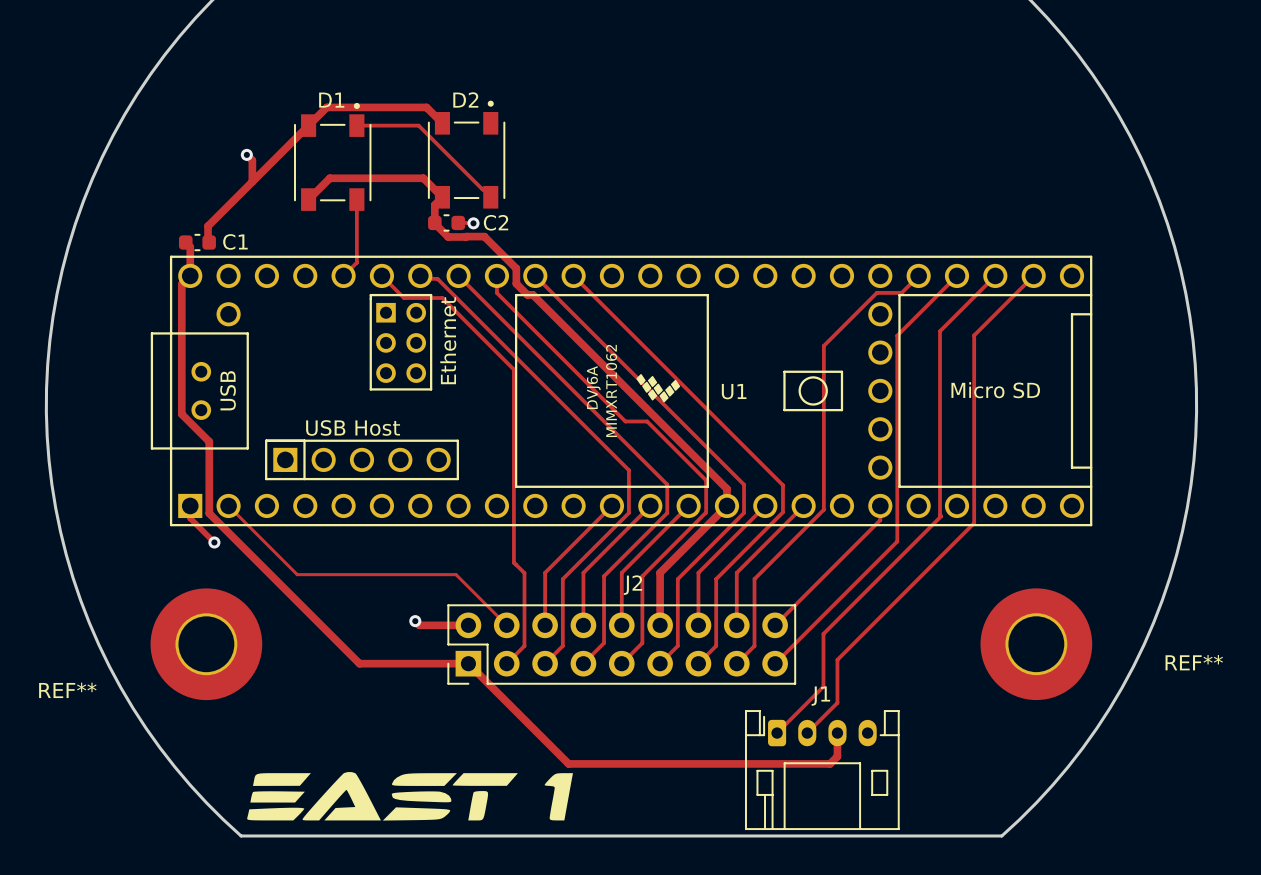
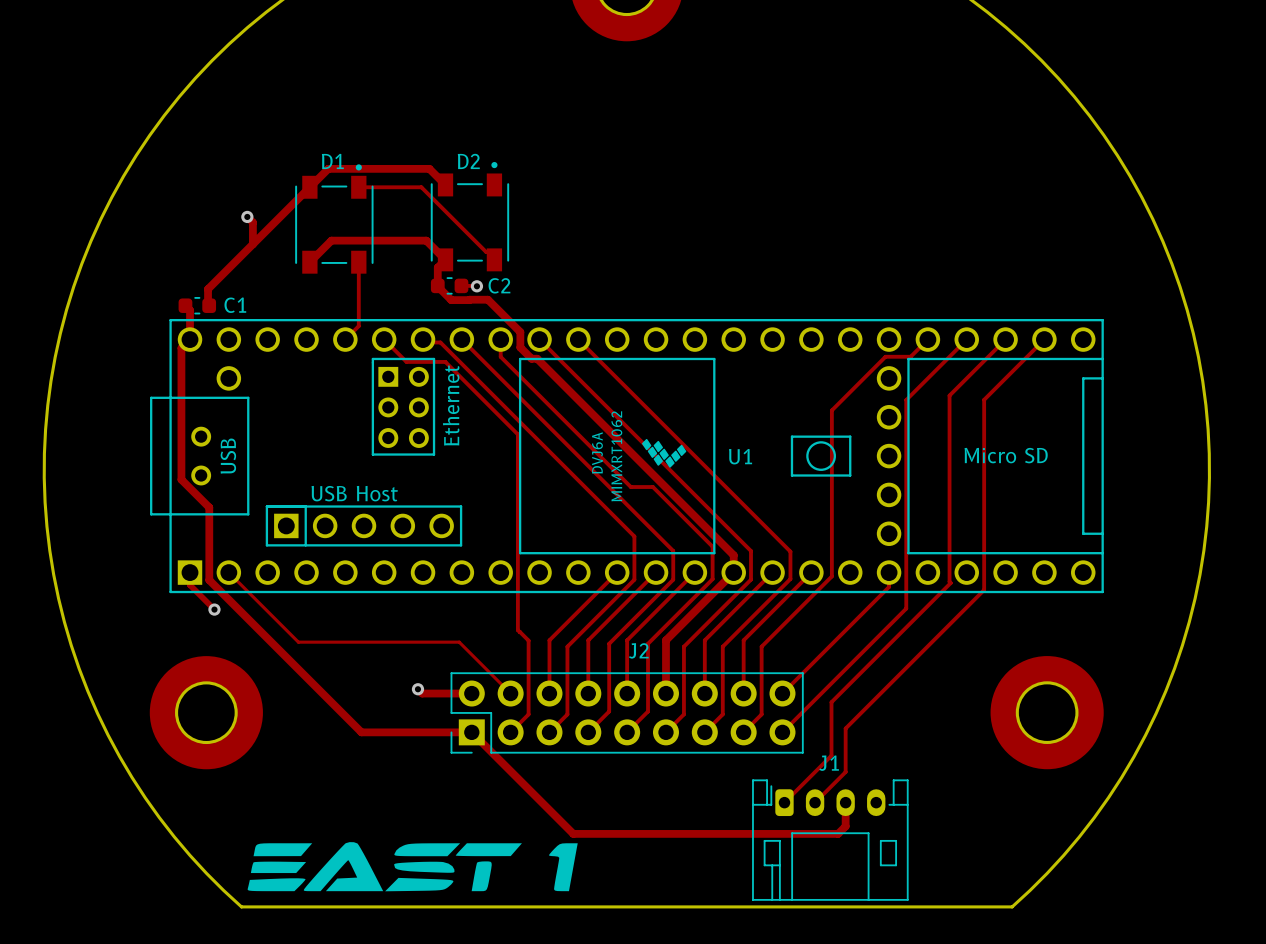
REF** name: REF** (1194, 662) -> none
REF** name: REF** (67, 690) -> none

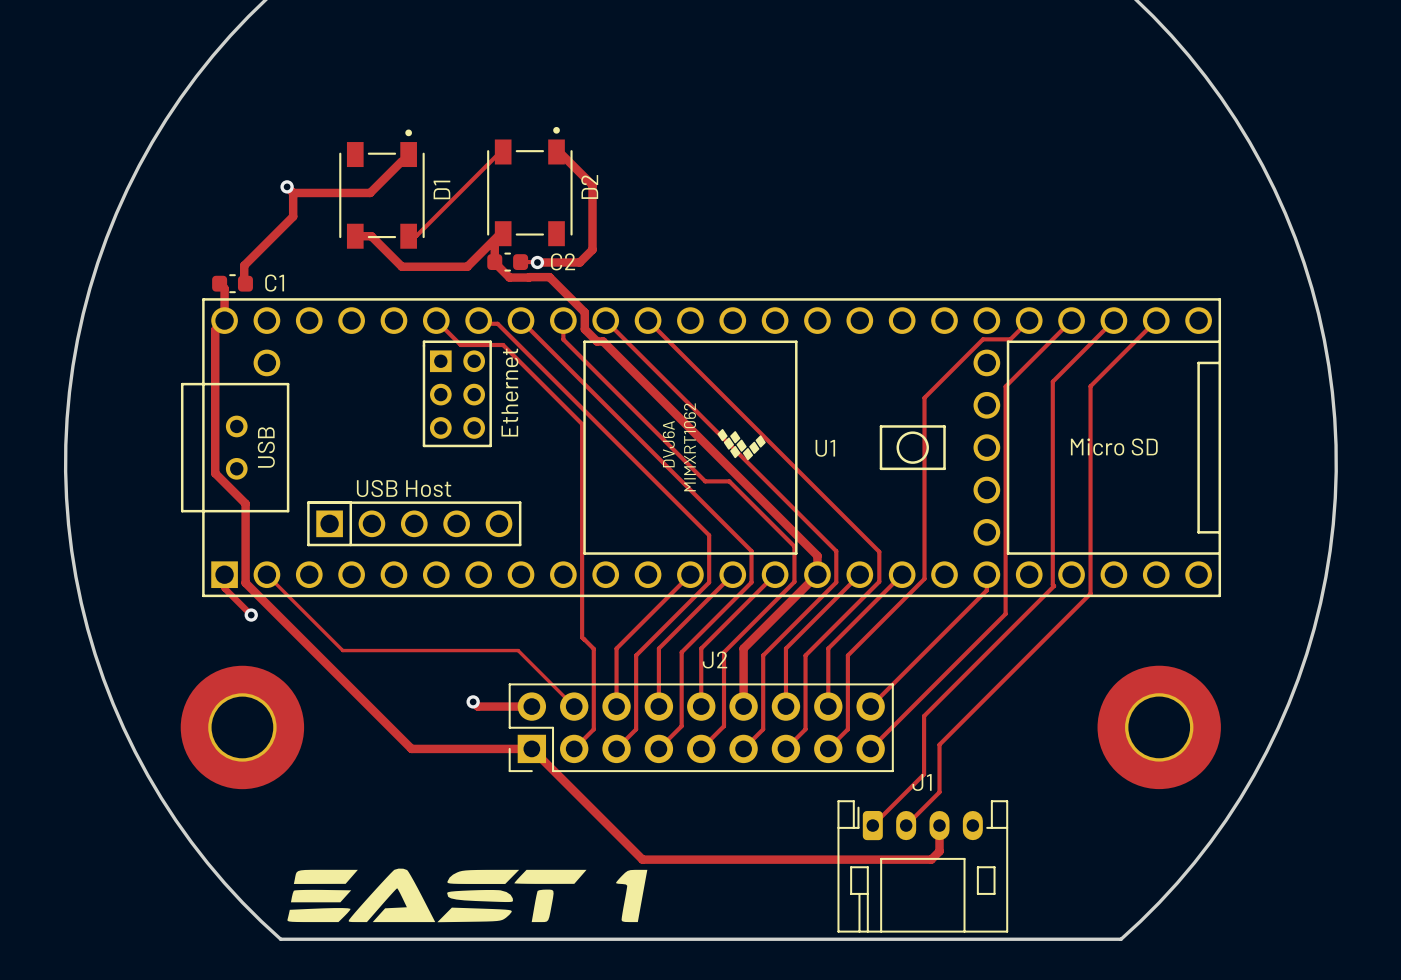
D1 name rotation: 0° (332, 161) -> 90° counterclockwise (441, 189)
D1 name position: D1 (332, 161) -> D1 (441, 189)
D2 name rotation: 0° (468, 161) -> 90° counterclockwise (589, 186)
D2 name position: D2 (468, 161) -> D2 (589, 186)
track: none -> (556, 149) (592, 185) (592, 249) (579, 262) (537, 262)
track: (445, 184) (429, 168) (328, 168) (252, 244) -> none
track: (358, 187) (421, 187) (486, 252) (489, 252) (494, 257) -> none
track: none -> (401, 161) (370, 192) (293, 192)
track: (445, 259) (426, 240) (331, 240) (309, 262) -> (503, 233) (503, 230) (467, 266) (401, 266) (371, 236) (355, 236)
track: (358, 262) (358, 326) (345, 339) -> (408, 236) (416, 236) (503, 149)

